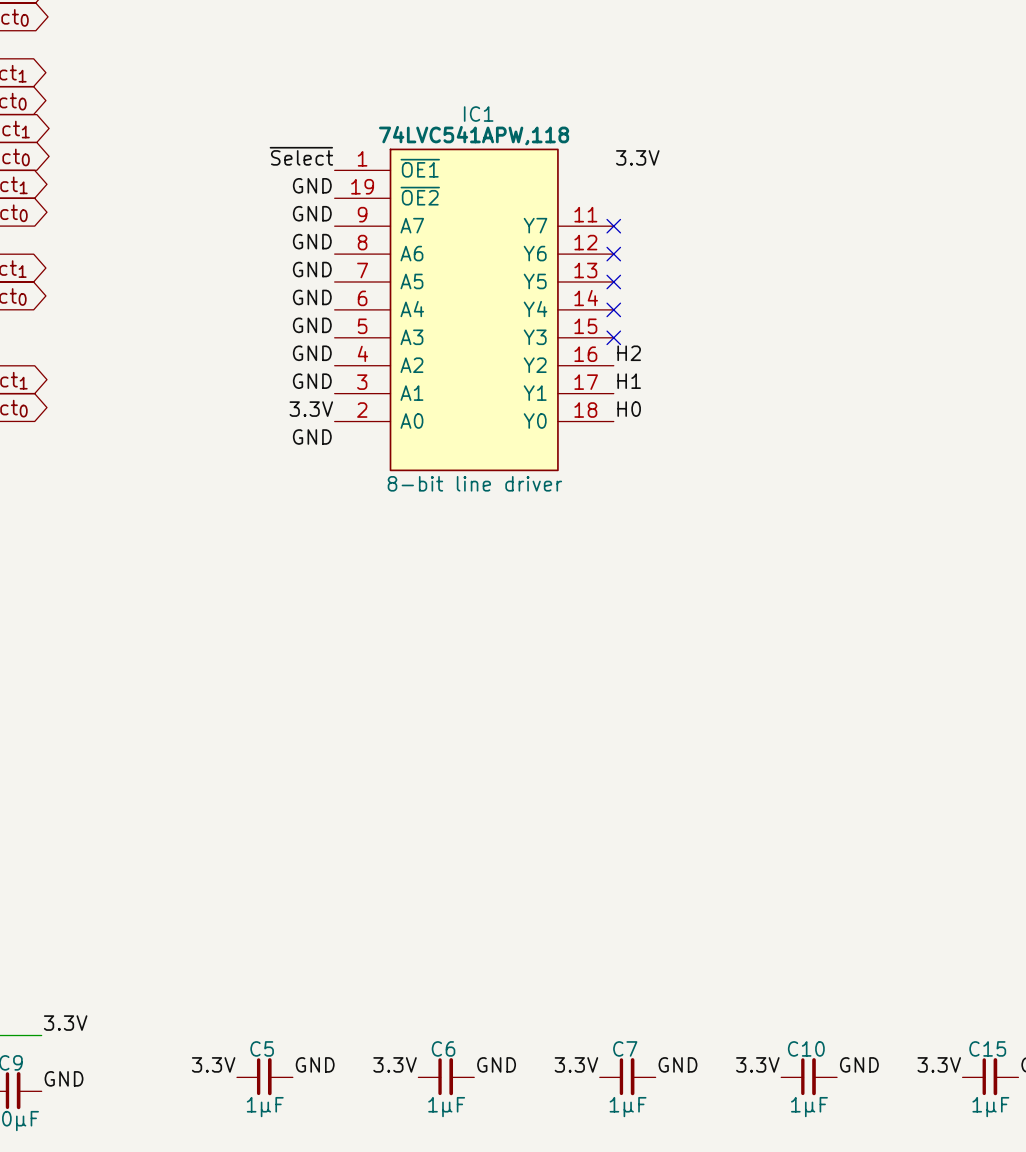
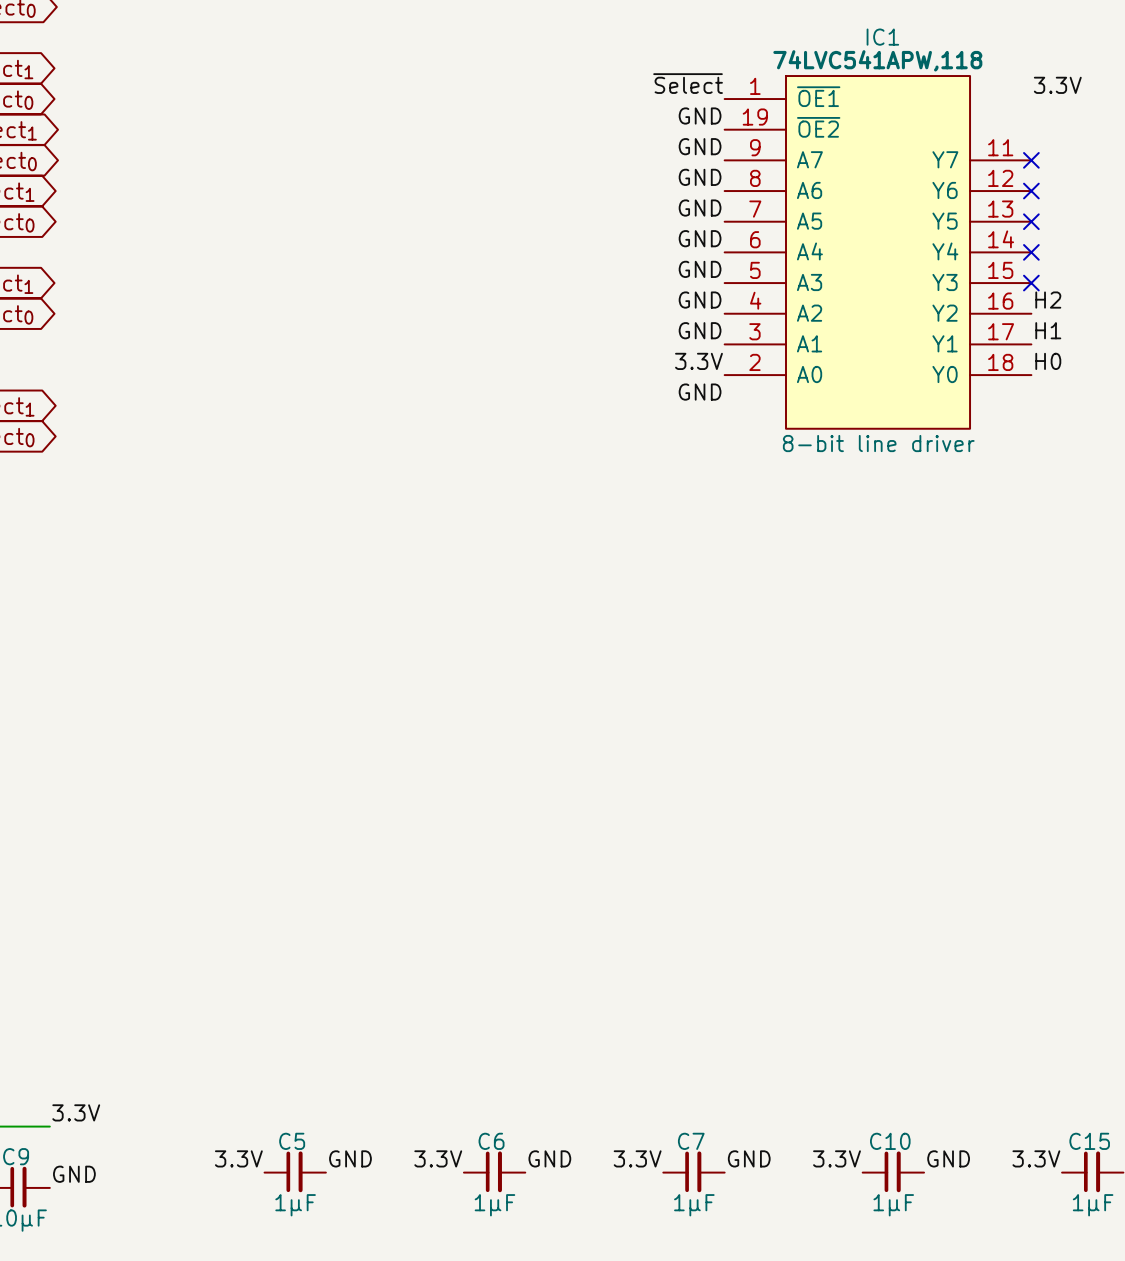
label: none -> ~{Select} (688, 83)
label: none -> 3.3V (1057, 85)
label: none -> GND (700, 116)
label: none -> GND (700, 146)
label: ~{Select} (301, 156) -> none
no-connect mark: none -> (1031, 160)
label: 3.3V (637, 157) -> none
label: none -> GND (700, 177)
no-connect mark: none -> (1031, 191)
label: GND (312, 185) -> none
label: none -> GND (700, 208)
no-connect mark: none -> (1031, 221)
label: GND (312, 213) -> none
no-connect mark: (613, 226) -> none
label: none -> GND (700, 238)
no-connect mark: none -> (1031, 252)
label: GND (312, 241) -> none
no-connect mark: (613, 254) -> none
label: none -> GND (700, 269)
no-connect mark: none -> (1031, 283)
label: GND (312, 269) -> none
no-connect mark: (613, 281) -> none
label: none -> GND (700, 300)
label: none -> H2 (1048, 300)
label: GND (312, 297) -> none
IC1 position: (474, 309) -> (878, 252)
no-connect mark: (613, 309) -> none
label: none -> GND (700, 330)
label: none -> H1 (1048, 330)
label: GND (312, 325) -> none
no-connect mark: (613, 337) -> none
label: none -> 3.3V (698, 361)
label: none -> H0 (1048, 361)
label: GND (312, 353) -> none
label: H2 (629, 353) -> none
label: none -> GND (700, 392)
label: GND (312, 381) -> none
label: H1 (629, 381) -> none
label: 3.3V (311, 409) -> none
label: H0 (629, 409) -> none
label: GND (312, 436) -> none

